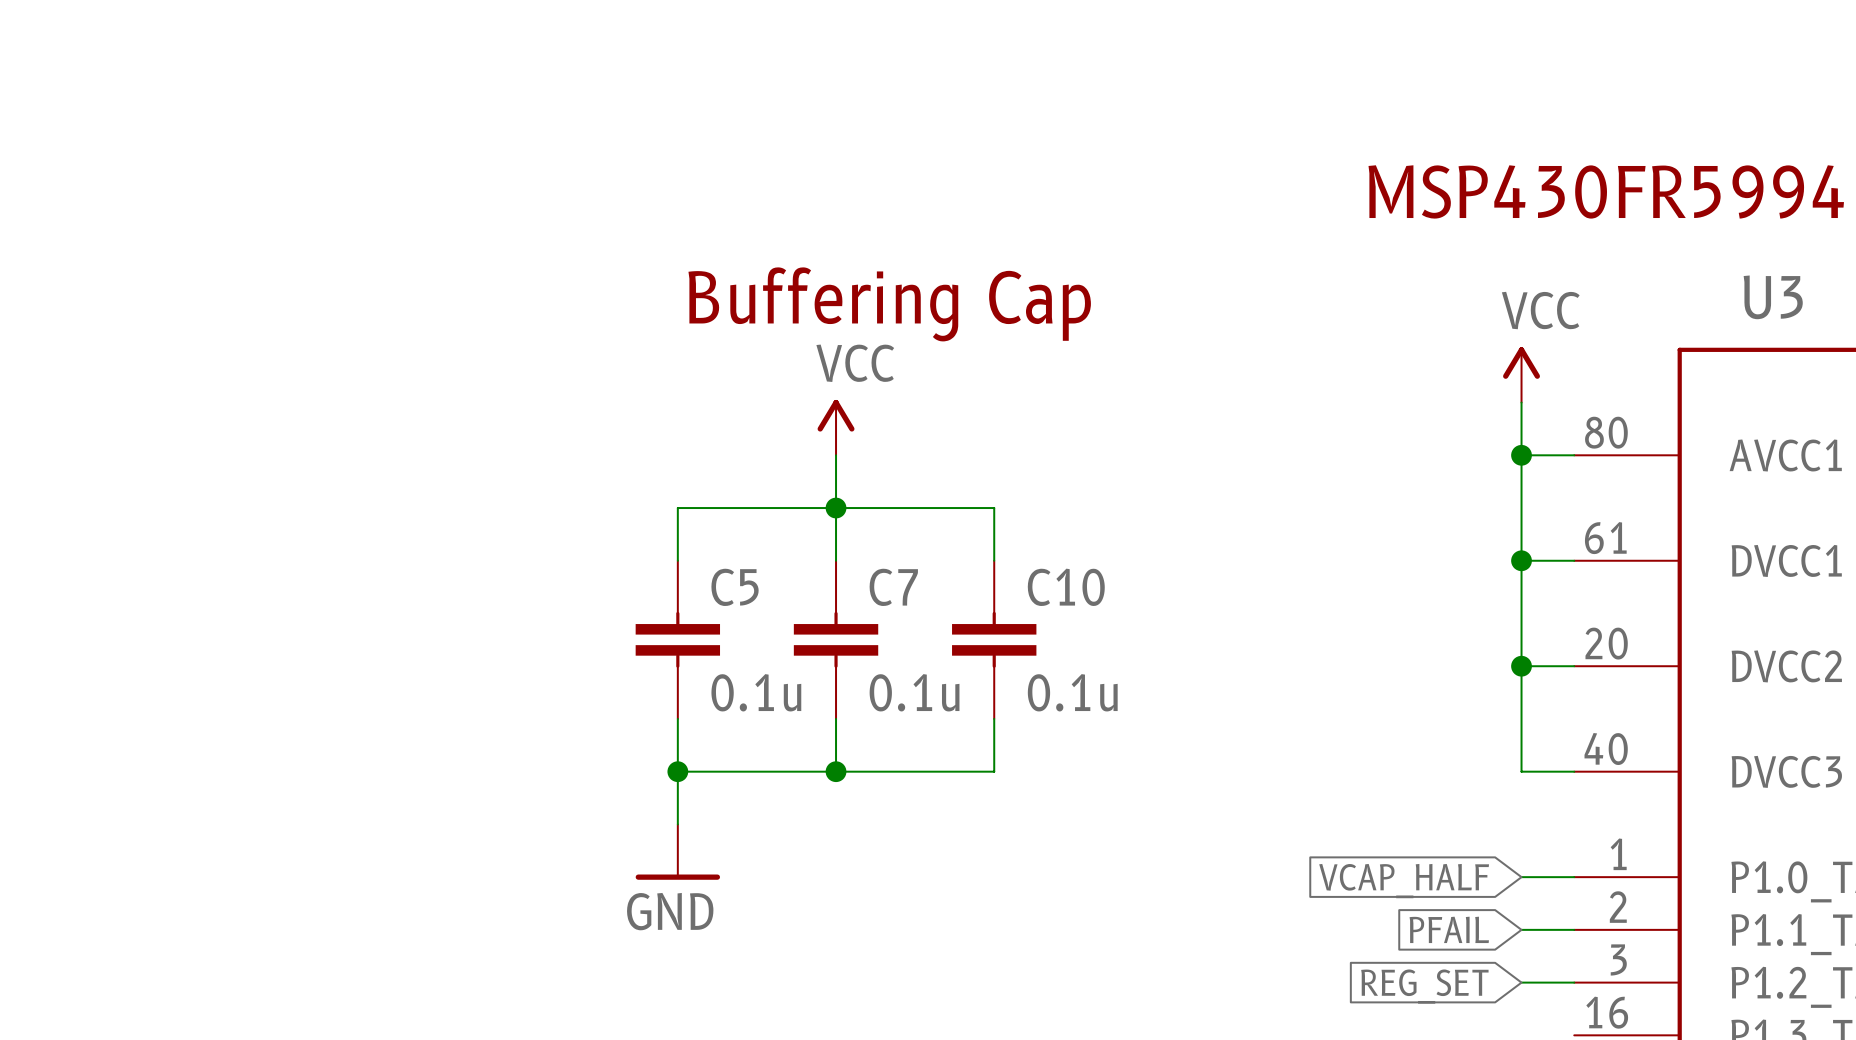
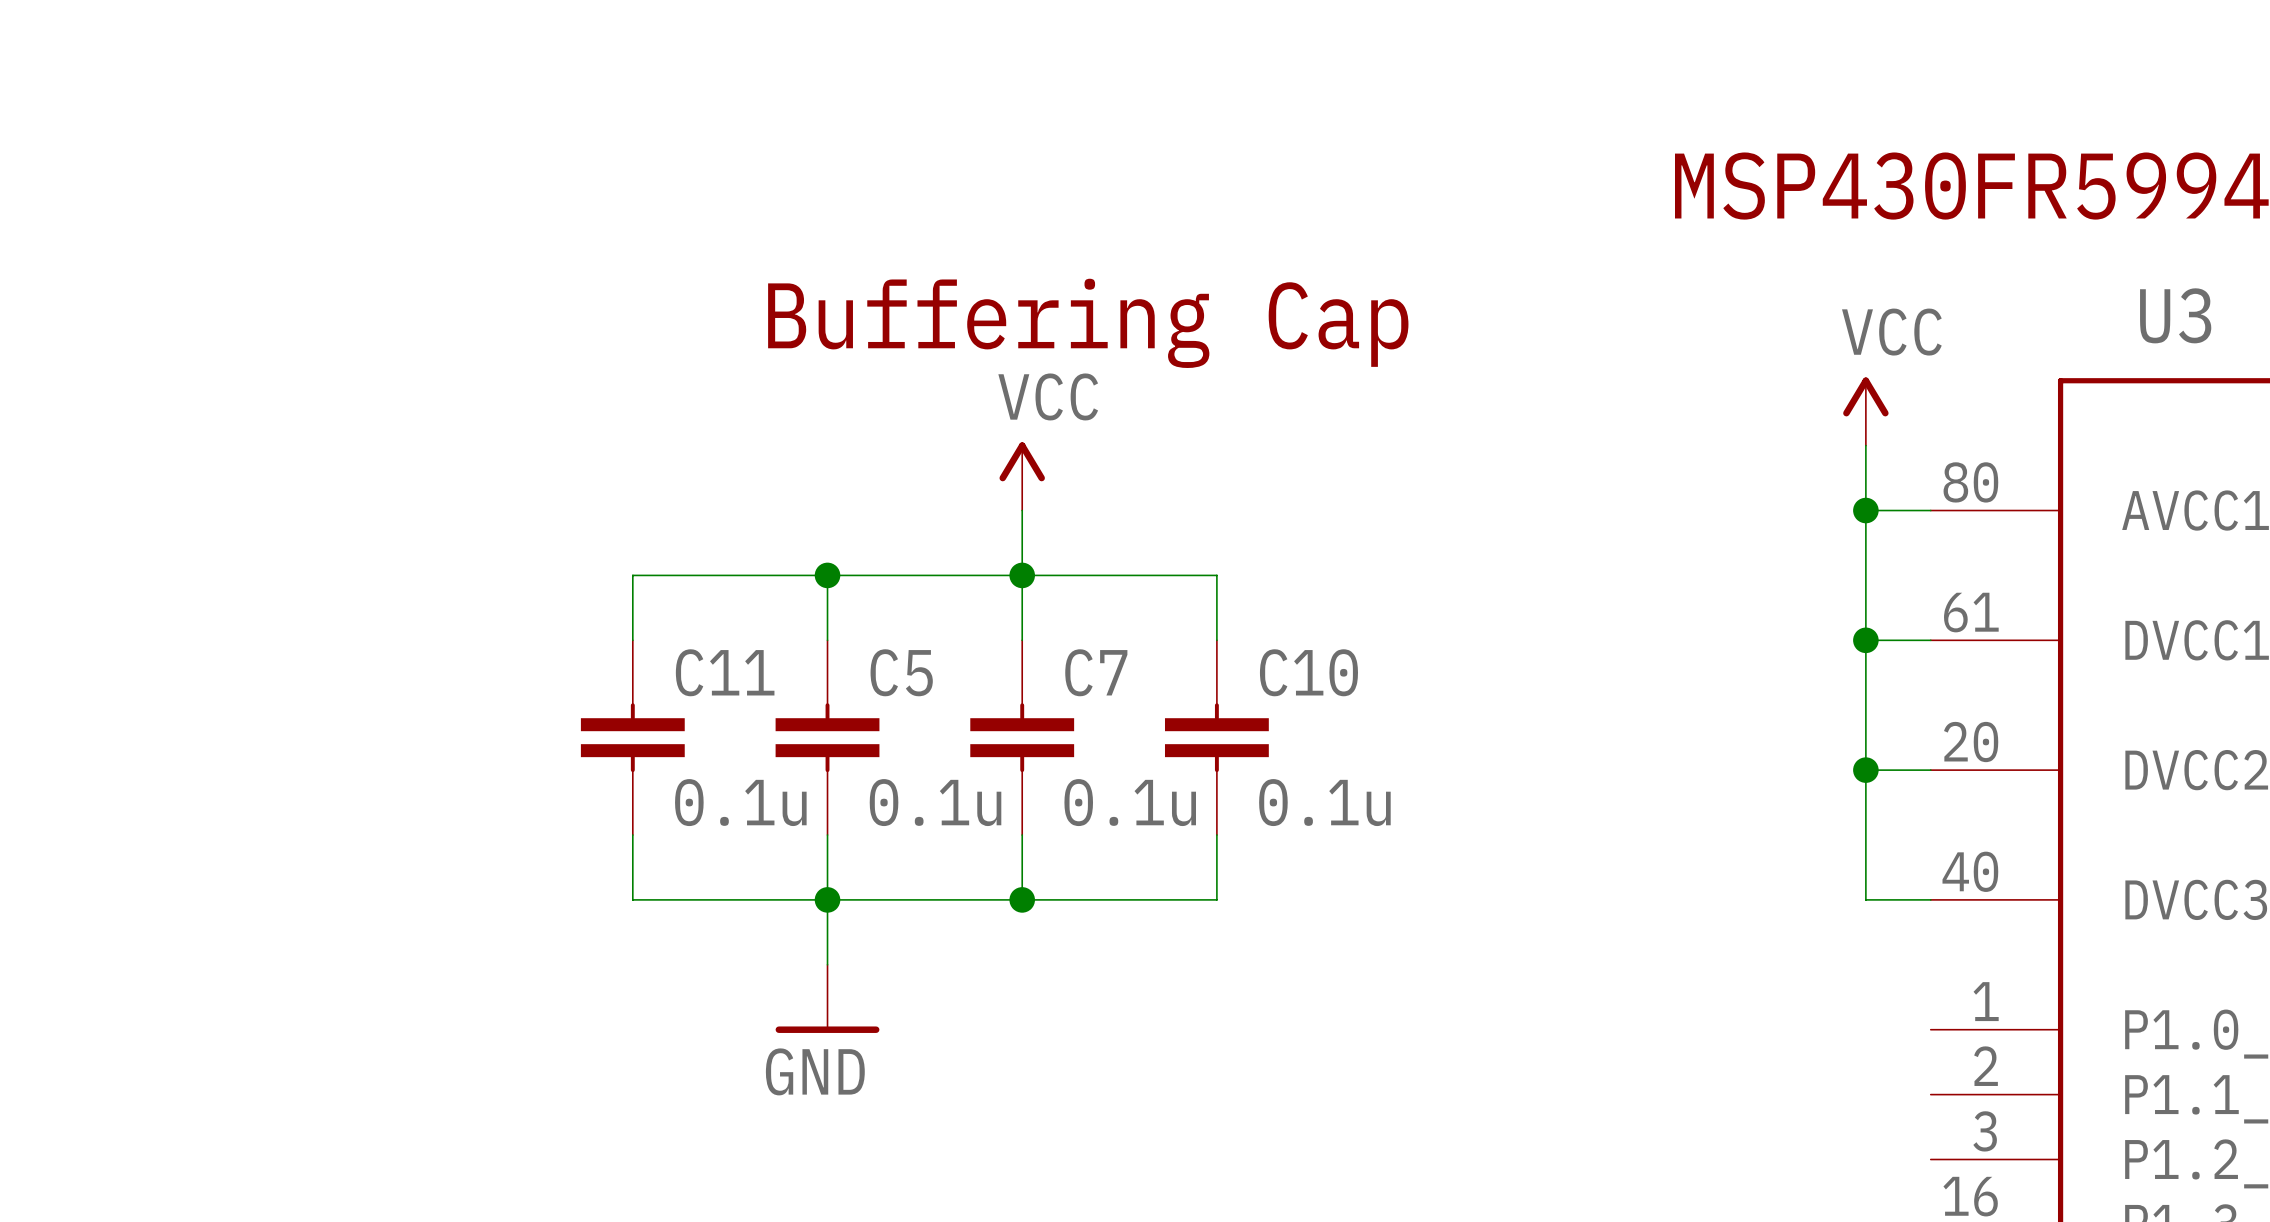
wire: none -> (827, 575) (632, 575) (632, 640)
junction: none -> (827, 575)
C11: none -> 0.1u (632, 737)
wire: none -> (632, 835) (632, 899) (827, 899)
wire: (1521, 877) (1574, 877) -> none
global label: VCAP_HALF (1404, 881) -> none
global label: PFAIL (1449, 929) -> none
wire: (1521, 929) (1574, 929) -> none
wire: (1521, 982) (1574, 982) -> none
global label: REG_SET (1424, 986) -> none

